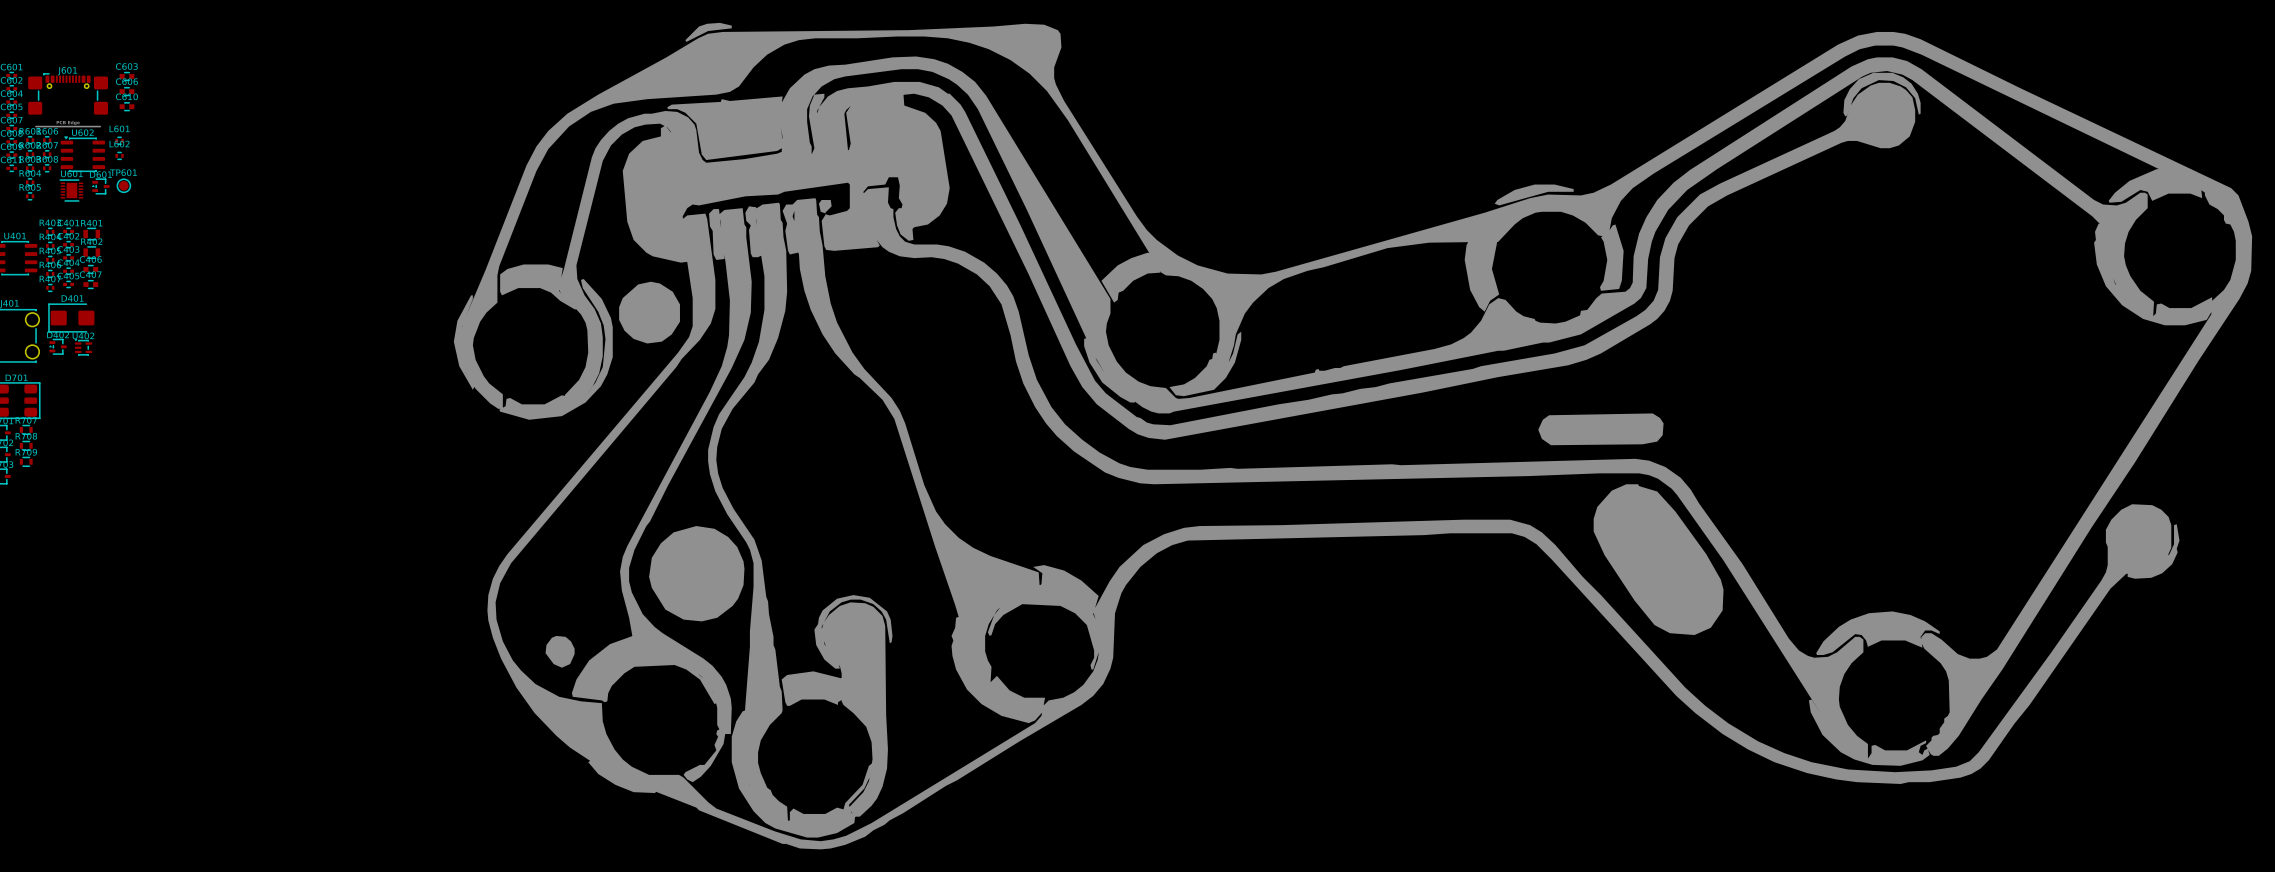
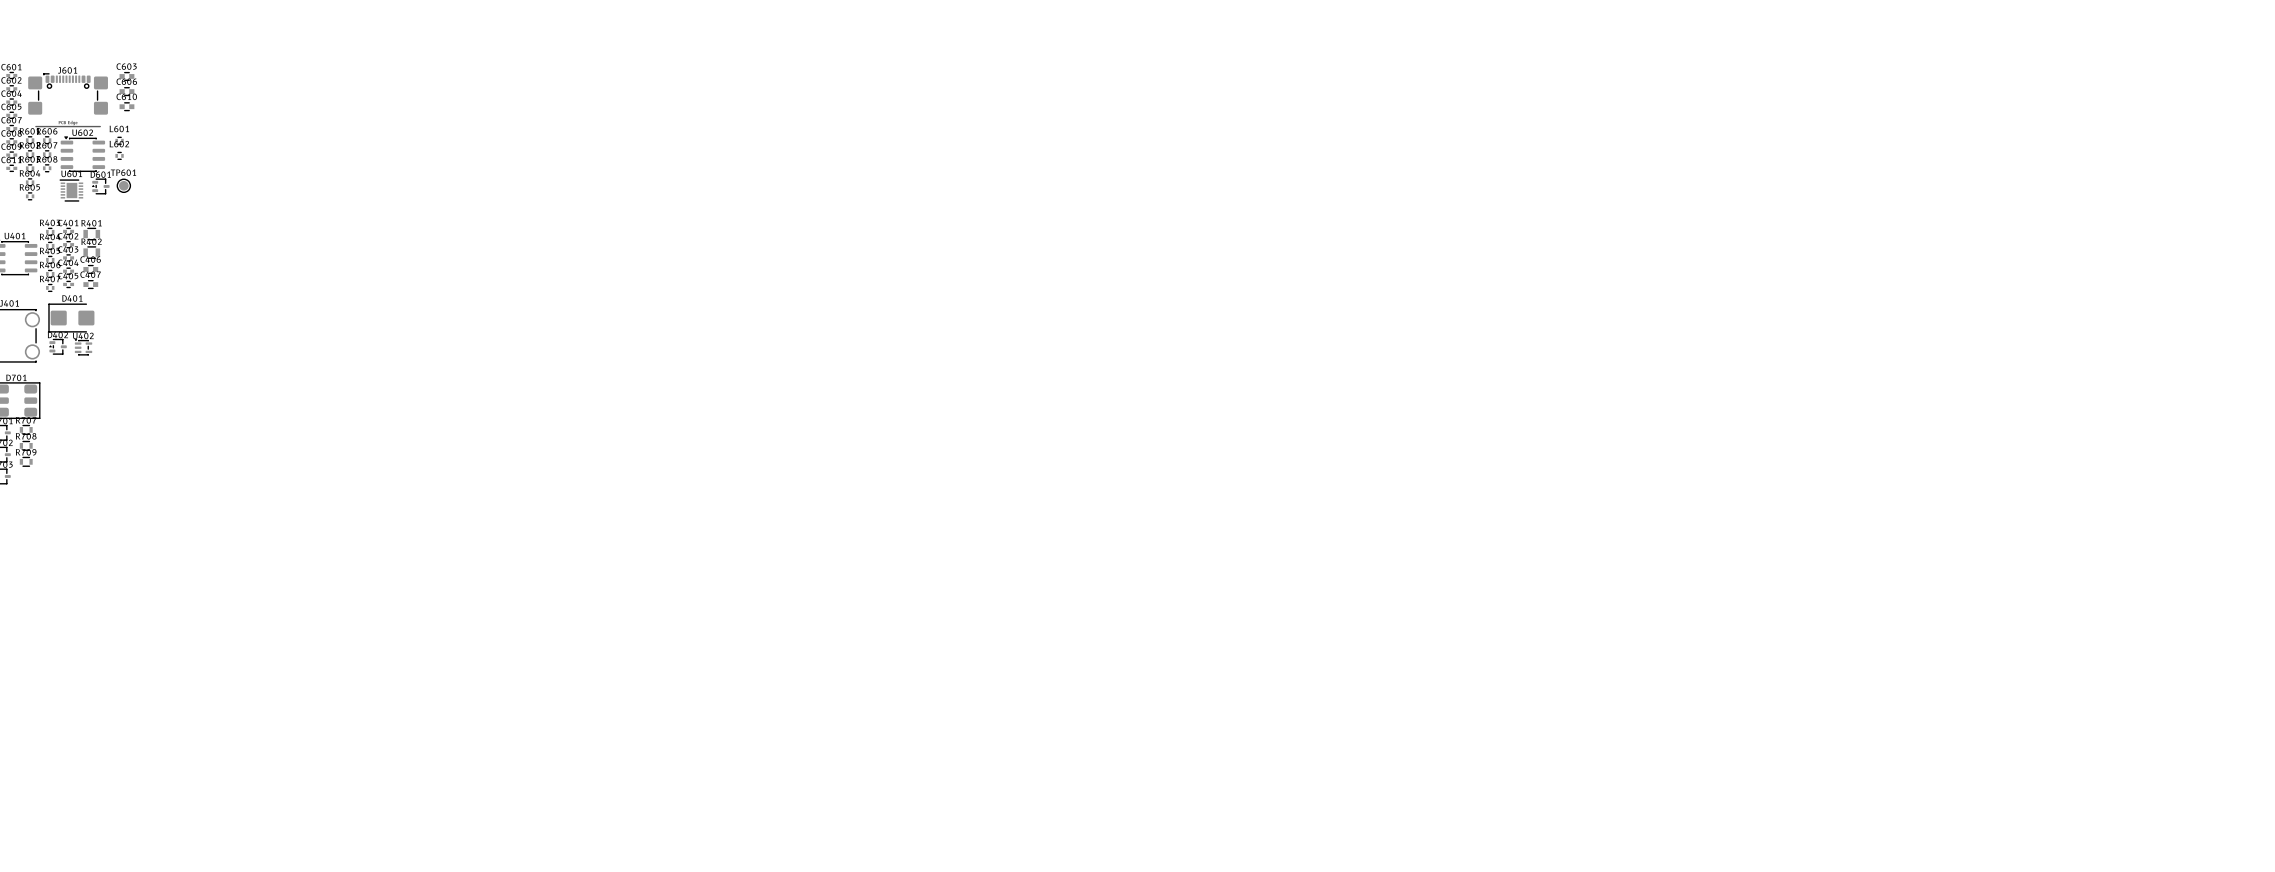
drawing: [453, 22, 2253, 850] -> none

